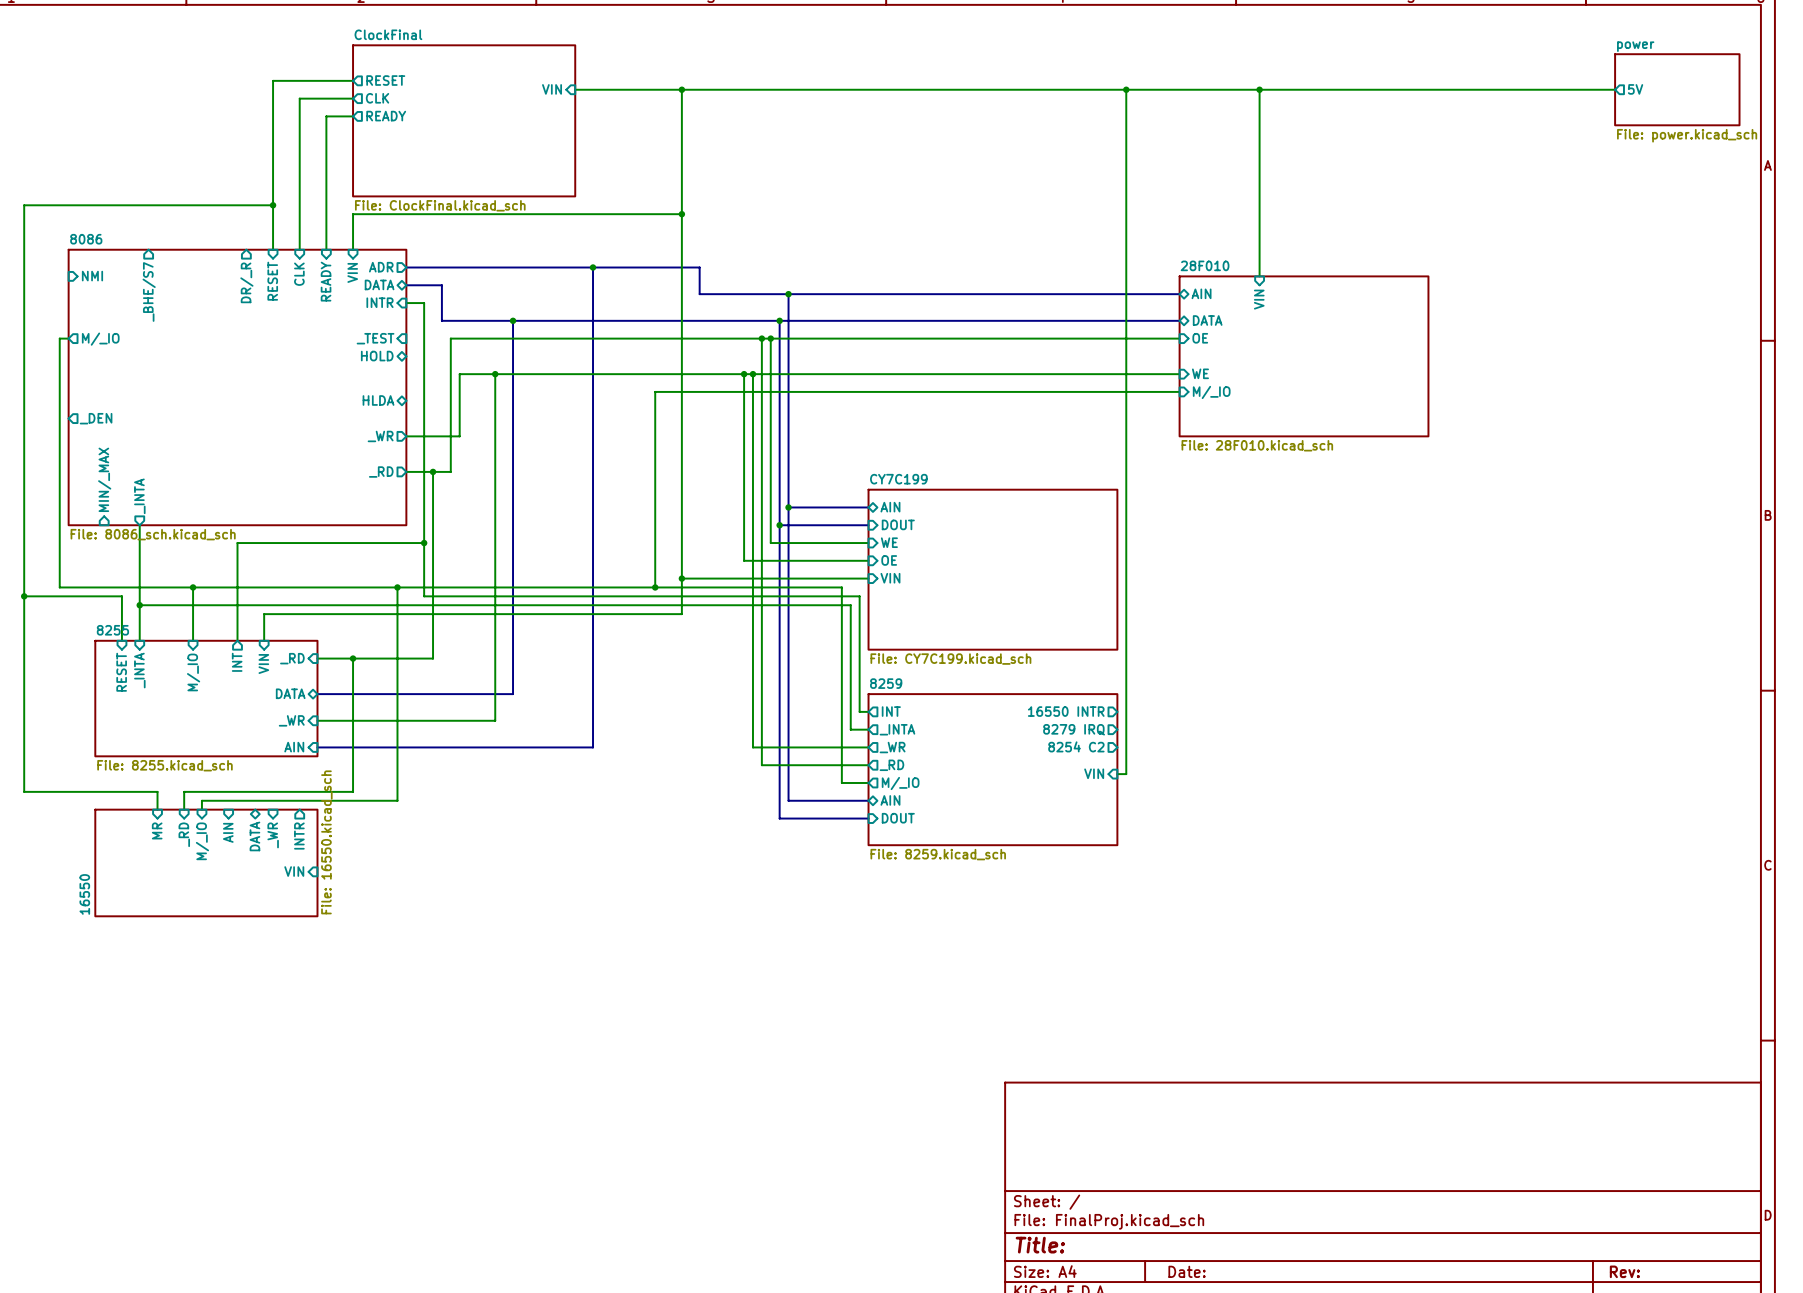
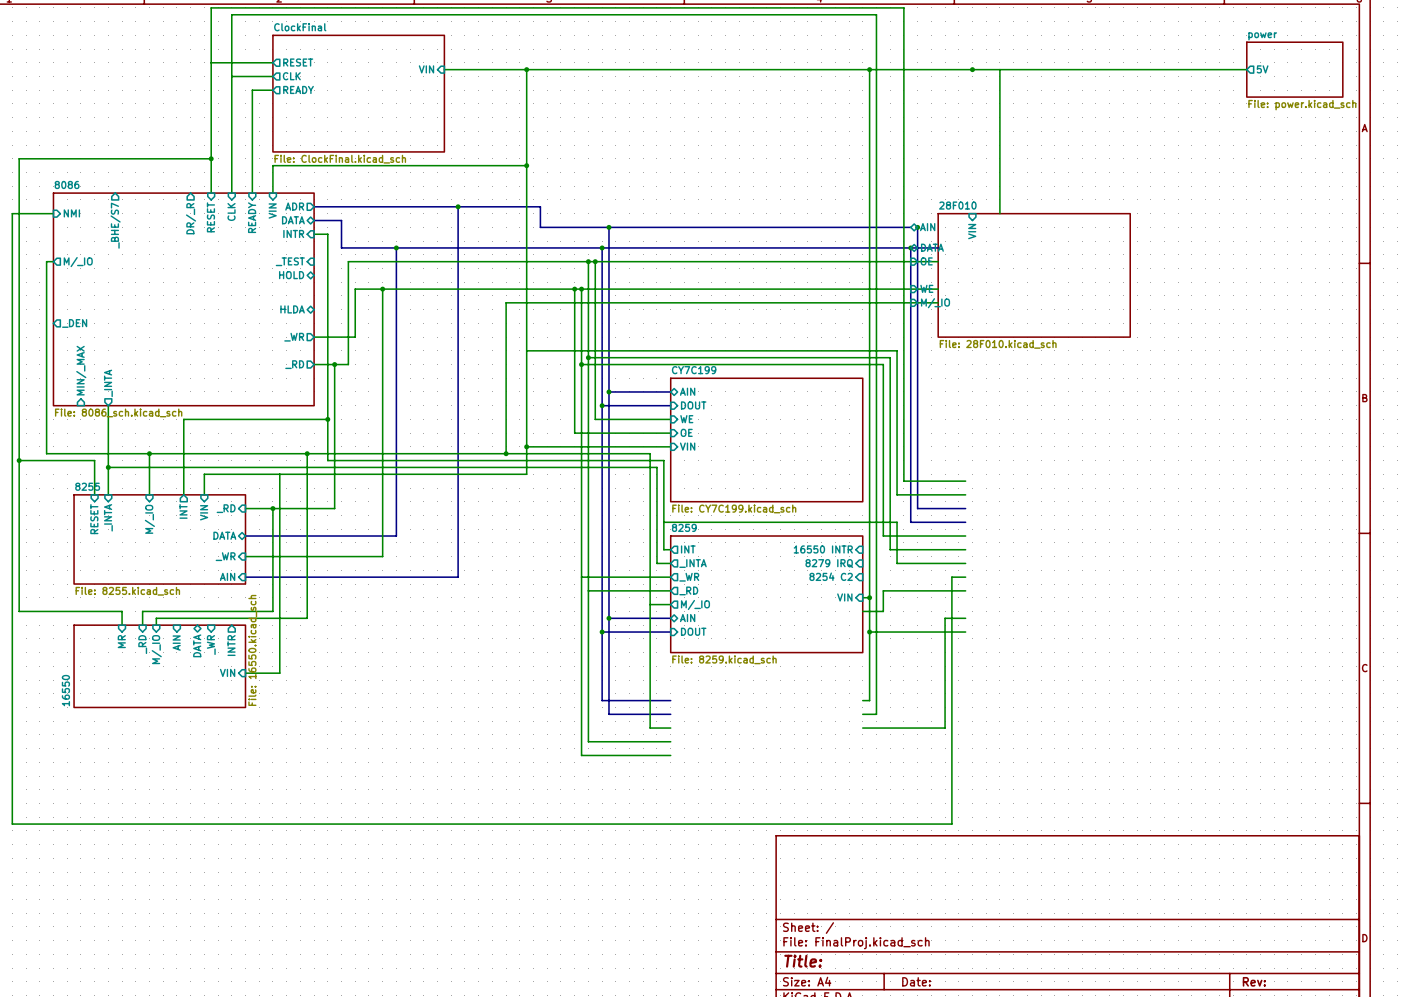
wire: none -> (211, 62) (211, 7) (903, 7) (903, 481) (965, 481)
wire: (1259, 89) (1259, 276) -> (999, 69) (999, 213)
wire: none -> (231, 76) (231, 14) (876, 14) (876, 714) (862, 714)
wire: none -> (53, 213) (12, 213) (12, 824) (951, 824) (951, 577) (965, 577)
bus: none -> (917, 227) (917, 508) (965, 508)
junction: none -> (917, 227)
junction: none -> (910, 247)
bus: none -> (938, 247) (910, 247) (910, 522) (965, 522)
wire: none -> (910, 261) (938, 261)
sheet 28F010 position: (1304, 356) -> (1034, 275)
wire: none -> (910, 289) (938, 289)
wire: none -> (910, 302) (938, 302)
wire: none -> (526, 350) (897, 350) (897, 494) (965, 494)
wire: none -> (588, 357) (890, 357) (890, 549) (965, 549)
junction: none -> (588, 357)
wire: none -> (581, 364) (883, 364) (883, 536) (965, 536)
junction: none -> (581, 364)
wire: none -> (279, 474) (279, 673) (245, 673)
wire: none -> (663, 522) (897, 522) (897, 563) (965, 563)
sheet pin shape: output (1066, 711) -> input (823, 549)
sheet pin shape: output (1074, 729) -> input (829, 563)
sheet pin shape: output (1076, 746) -> input (831, 576)
wire: none -> (581, 577) (581, 755) (670, 755)
wire: none -> (588, 590) (588, 741) (670, 741)
wire: none -> (965, 590) (883, 590) (883, 611) (862, 611)
wire: none -> (869, 597) (869, 700) (862, 700)
junction: none -> (869, 597)
wire: none -> (650, 604) (650, 728) (670, 728)
bus: none -> (608, 618) (608, 714) (670, 714)
junction: none -> (608, 618)
wire: none -> (965, 618) (945, 618) (945, 728) (862, 728)
bus: none -> (602, 632) (602, 700) (670, 700)
junction: none -> (602, 632)
wire: none -> (869, 632) (965, 632)
junction: none -> (869, 632)

